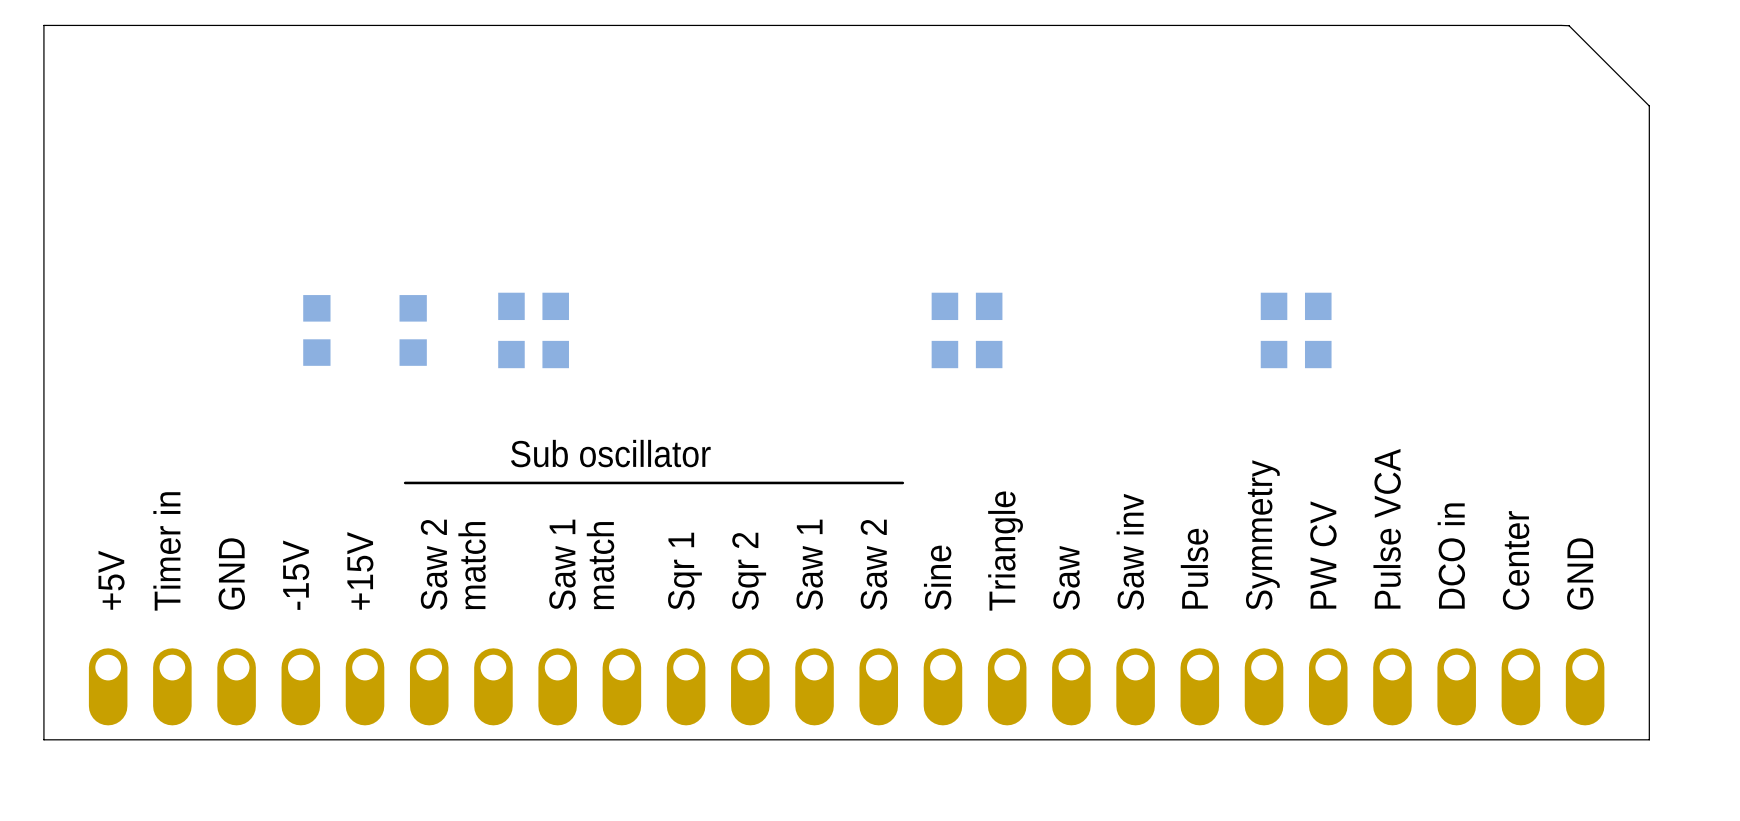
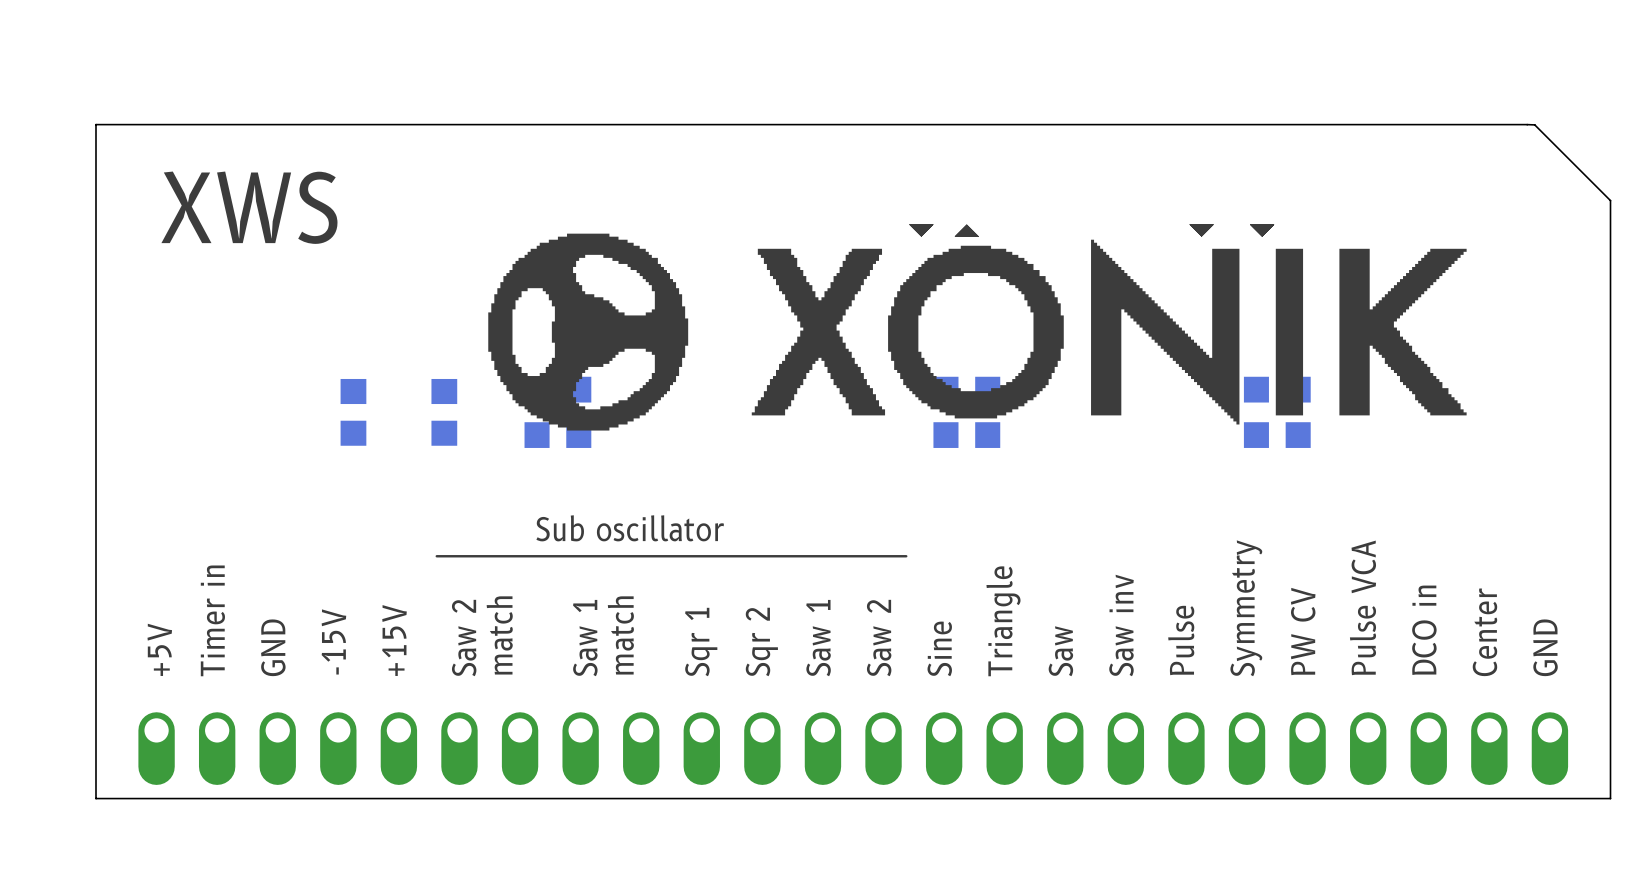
text: none -> XWS (249, 207)
drawing: none -> [751, 224, 1304, 425]
drawing: none -> [488, 233, 689, 431]
drawing: none -> [1339, 248, 1467, 416]

